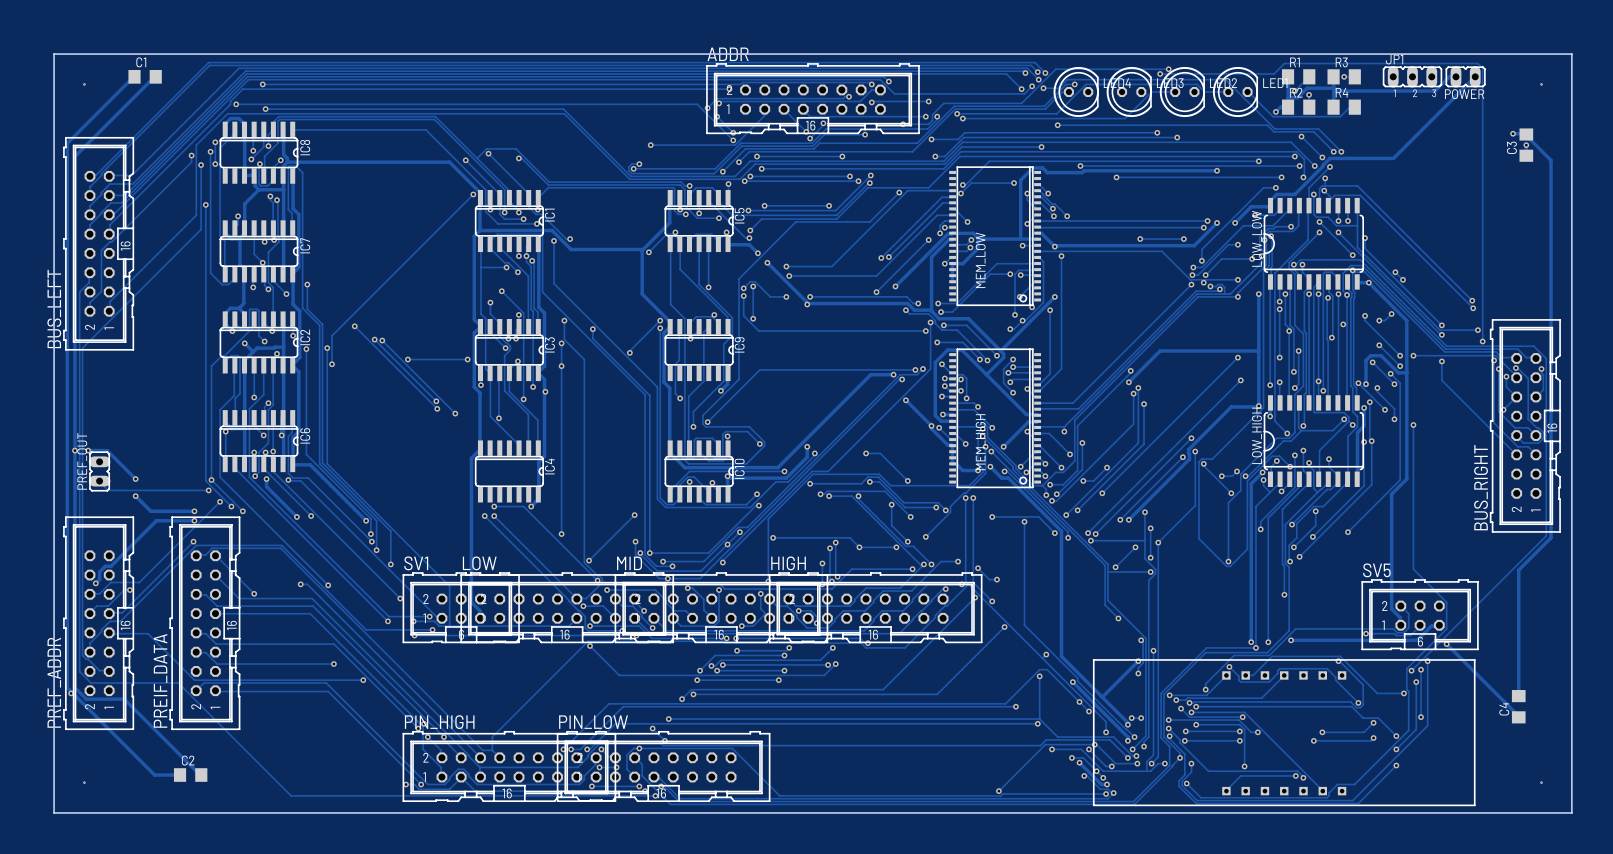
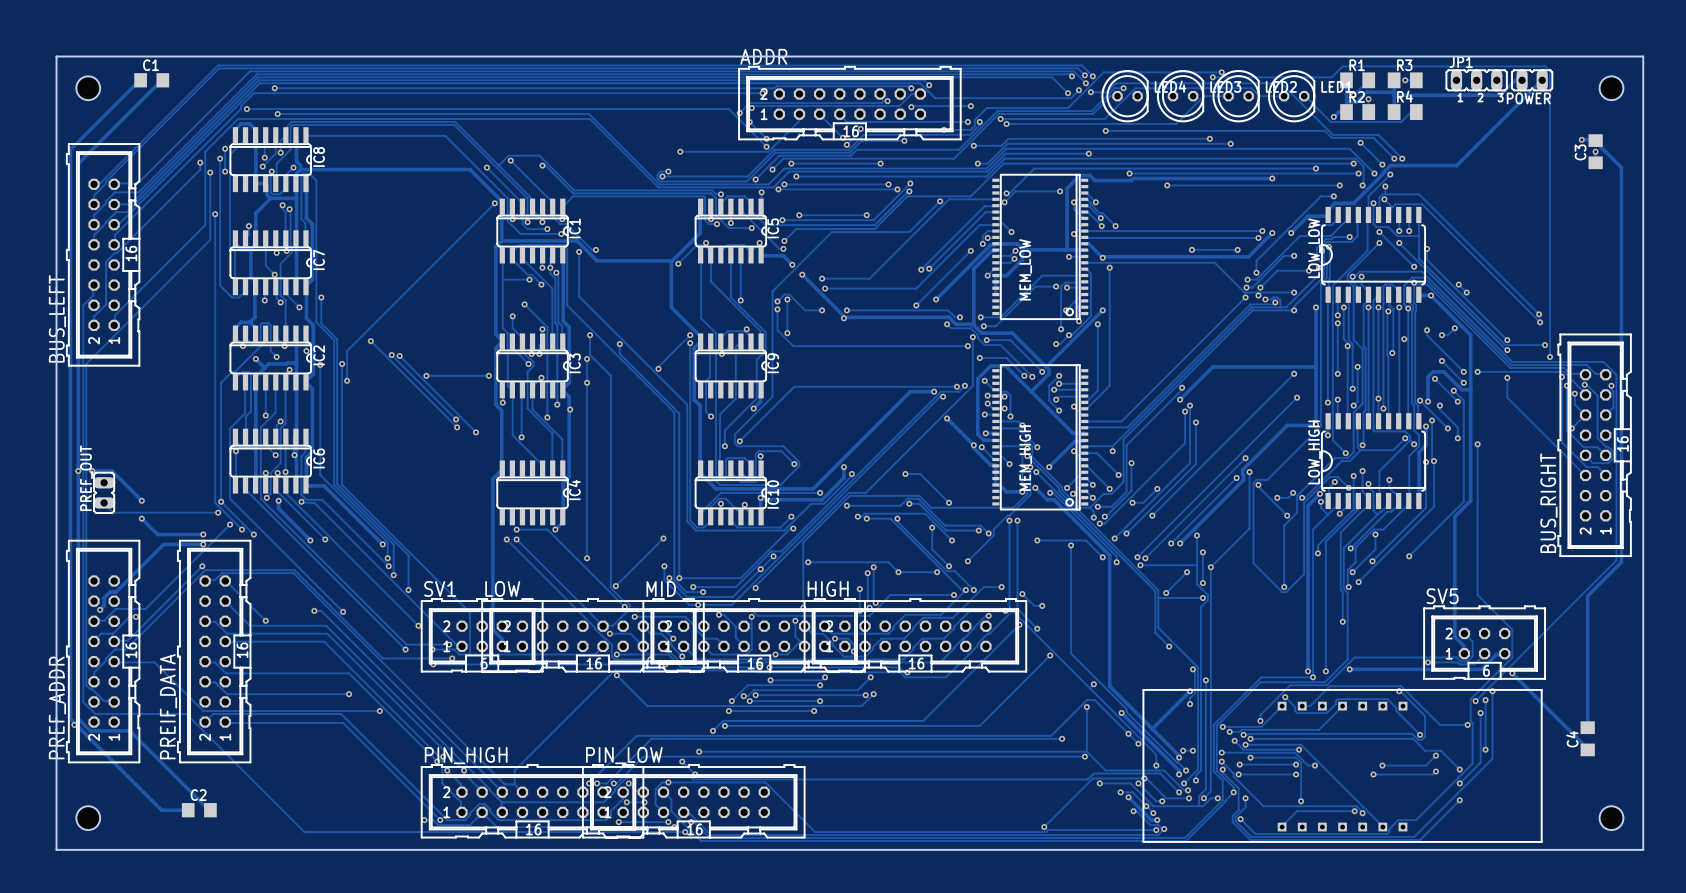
hole size: [83, 83, 85, 85] -> [76, 76, 101, 101]
hole size: [1541, 83, 1542, 85] -> [1599, 76, 1624, 101]
hole size: [83, 782, 85, 784] -> [76, 806, 101, 831]
hole size: [1541, 782, 1542, 784] -> [1599, 806, 1624, 831]

